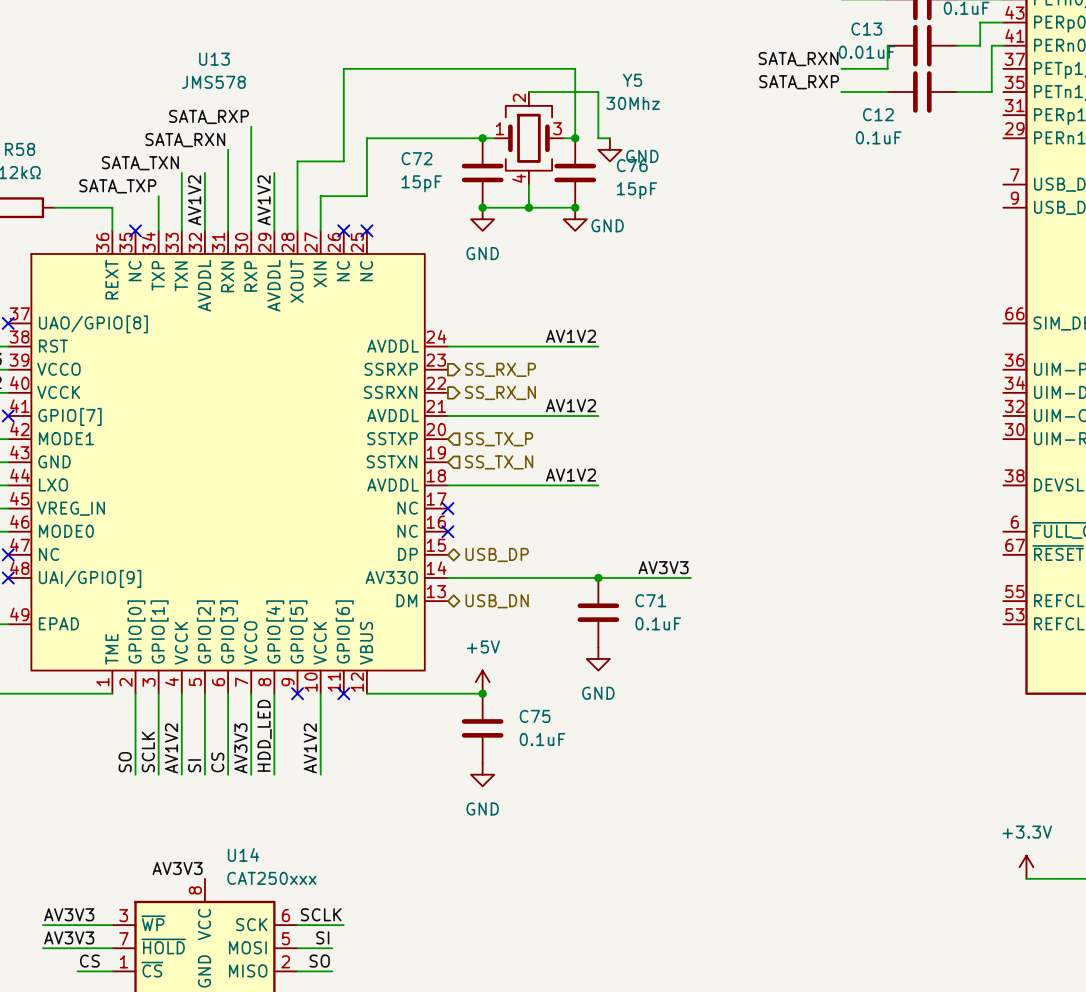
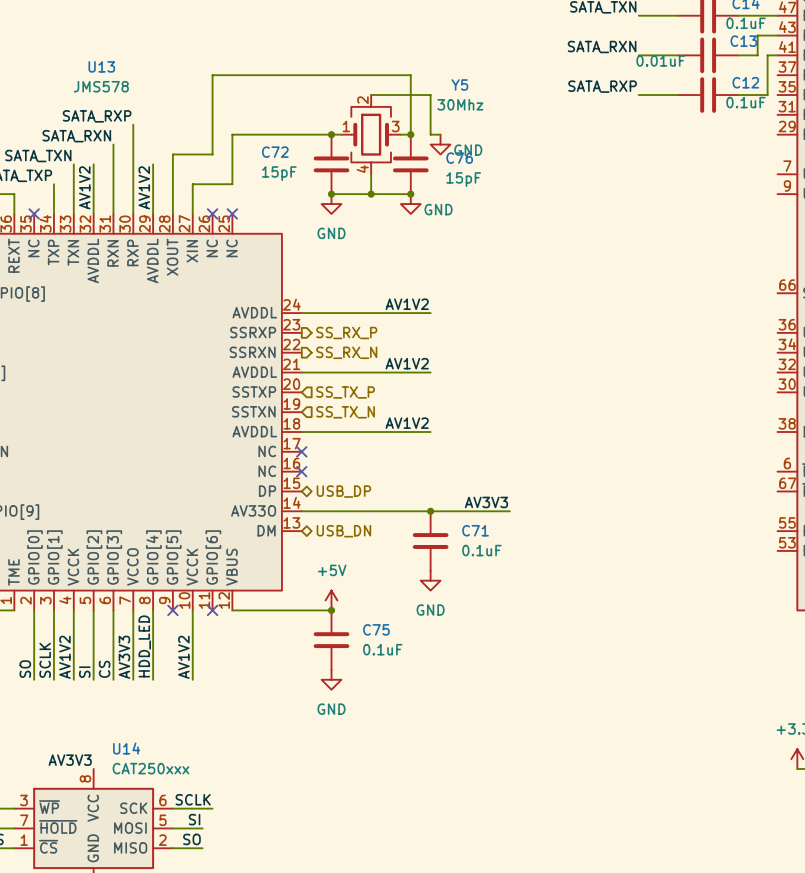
C13 name position: C13 (866, 29) -> C13 (743, 41)
wire: (887, 45) (887, 68) (841, 68) -> (678, 55) (638, 55)
label position: SATA_RXN (798, 59) -> SATA_RXN (602, 47)
C12 name position: C12 (878, 114) -> C12 (745, 82)
C12 value position: 0.1uF (878, 137) -> 0.1uF (746, 102)

